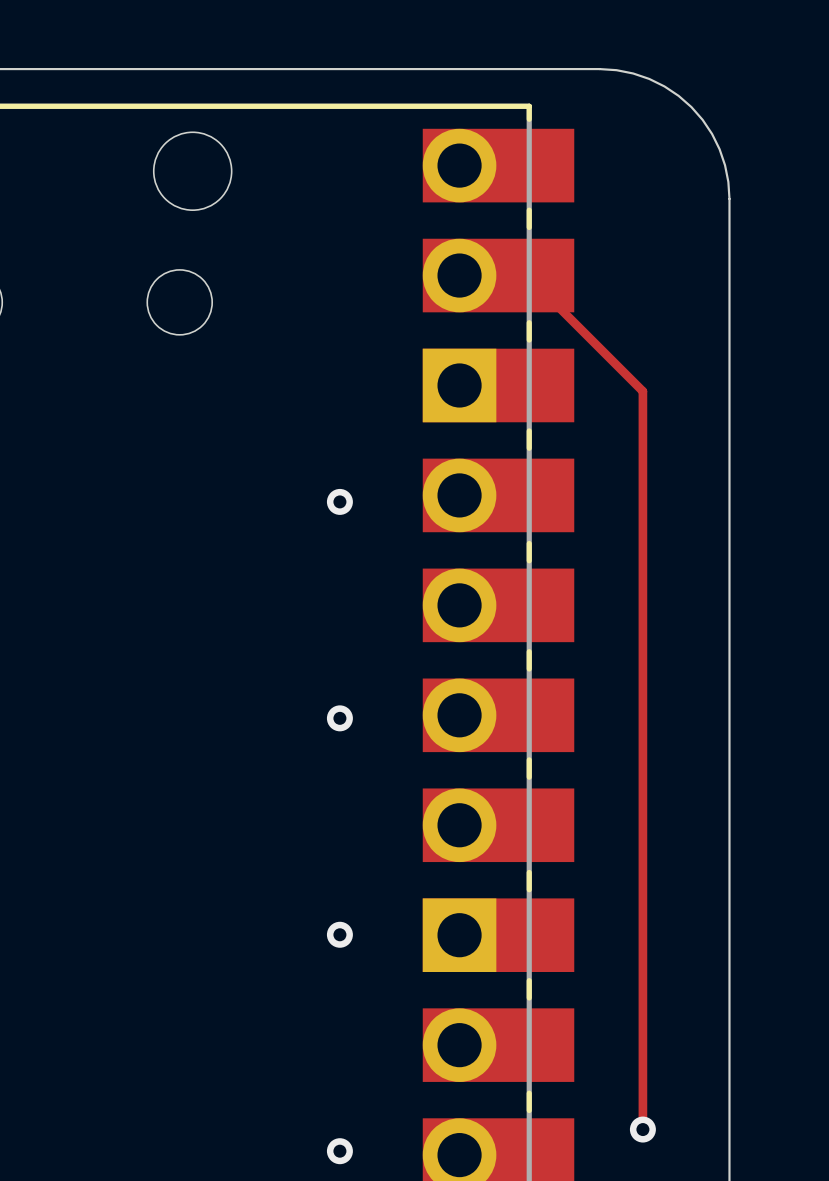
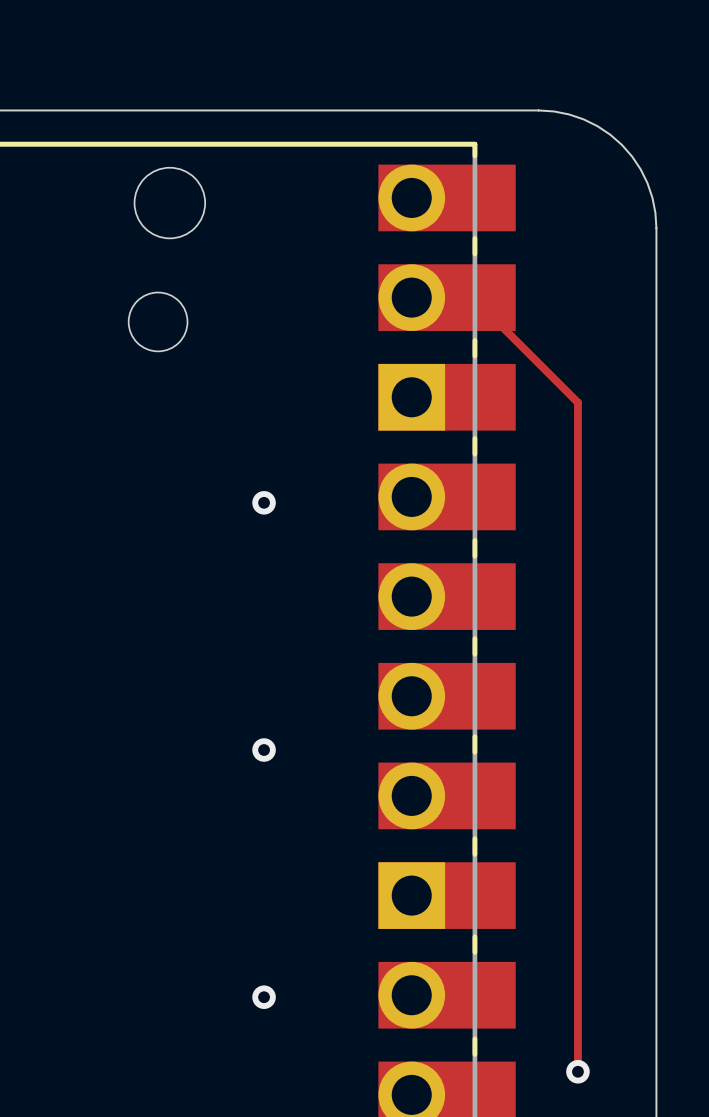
via position: (339, 501) -> (264, 502)
via position: (339, 718) -> (264, 750)
via: (339, 934) -> none
via: none -> (264, 997)
via: (339, 1151) -> none

